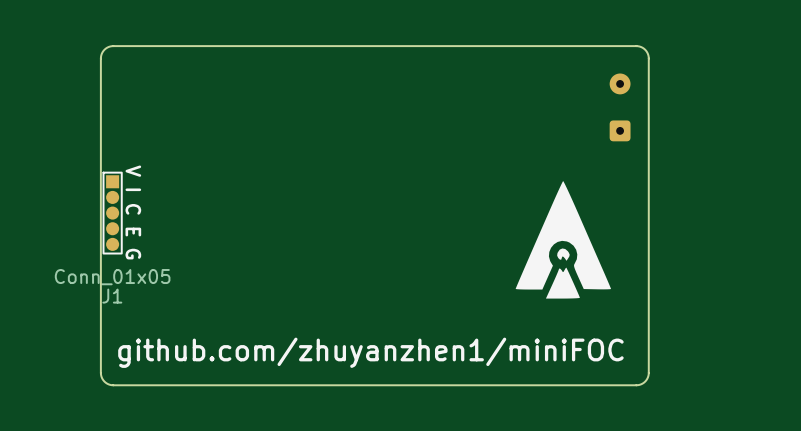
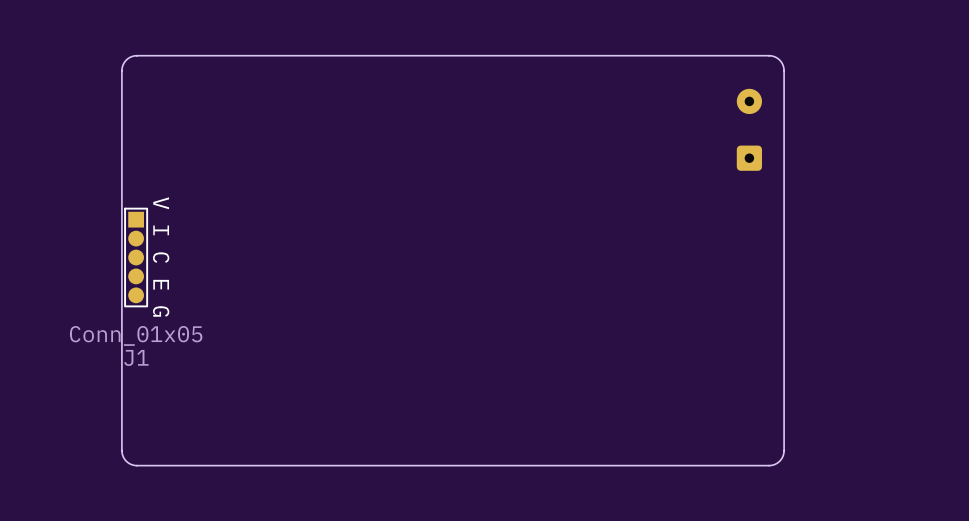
drawing: [515, 181, 612, 299] -> none
text: github.com/zhuyanzhen1/miniFOC (370, 352) -> none

